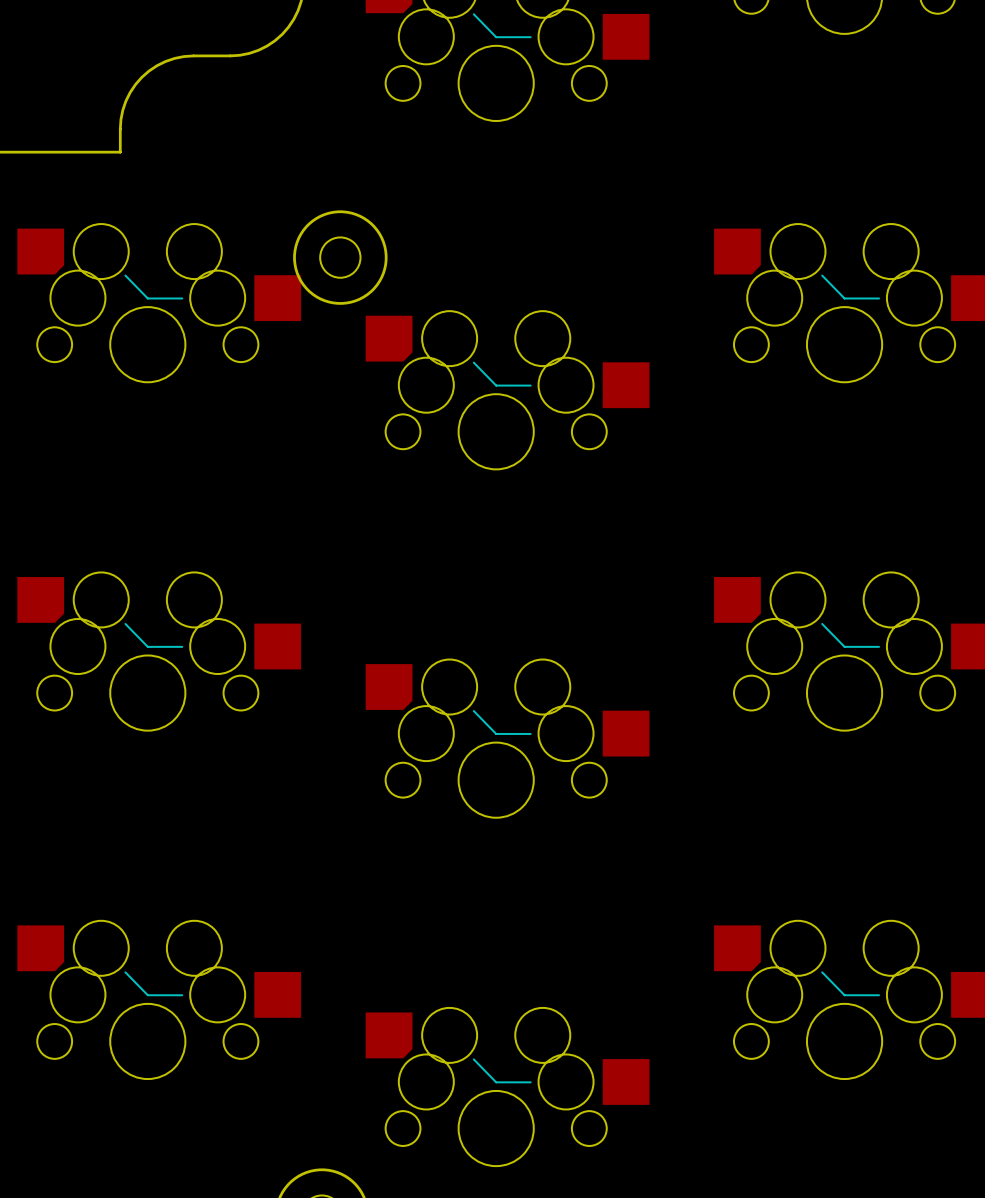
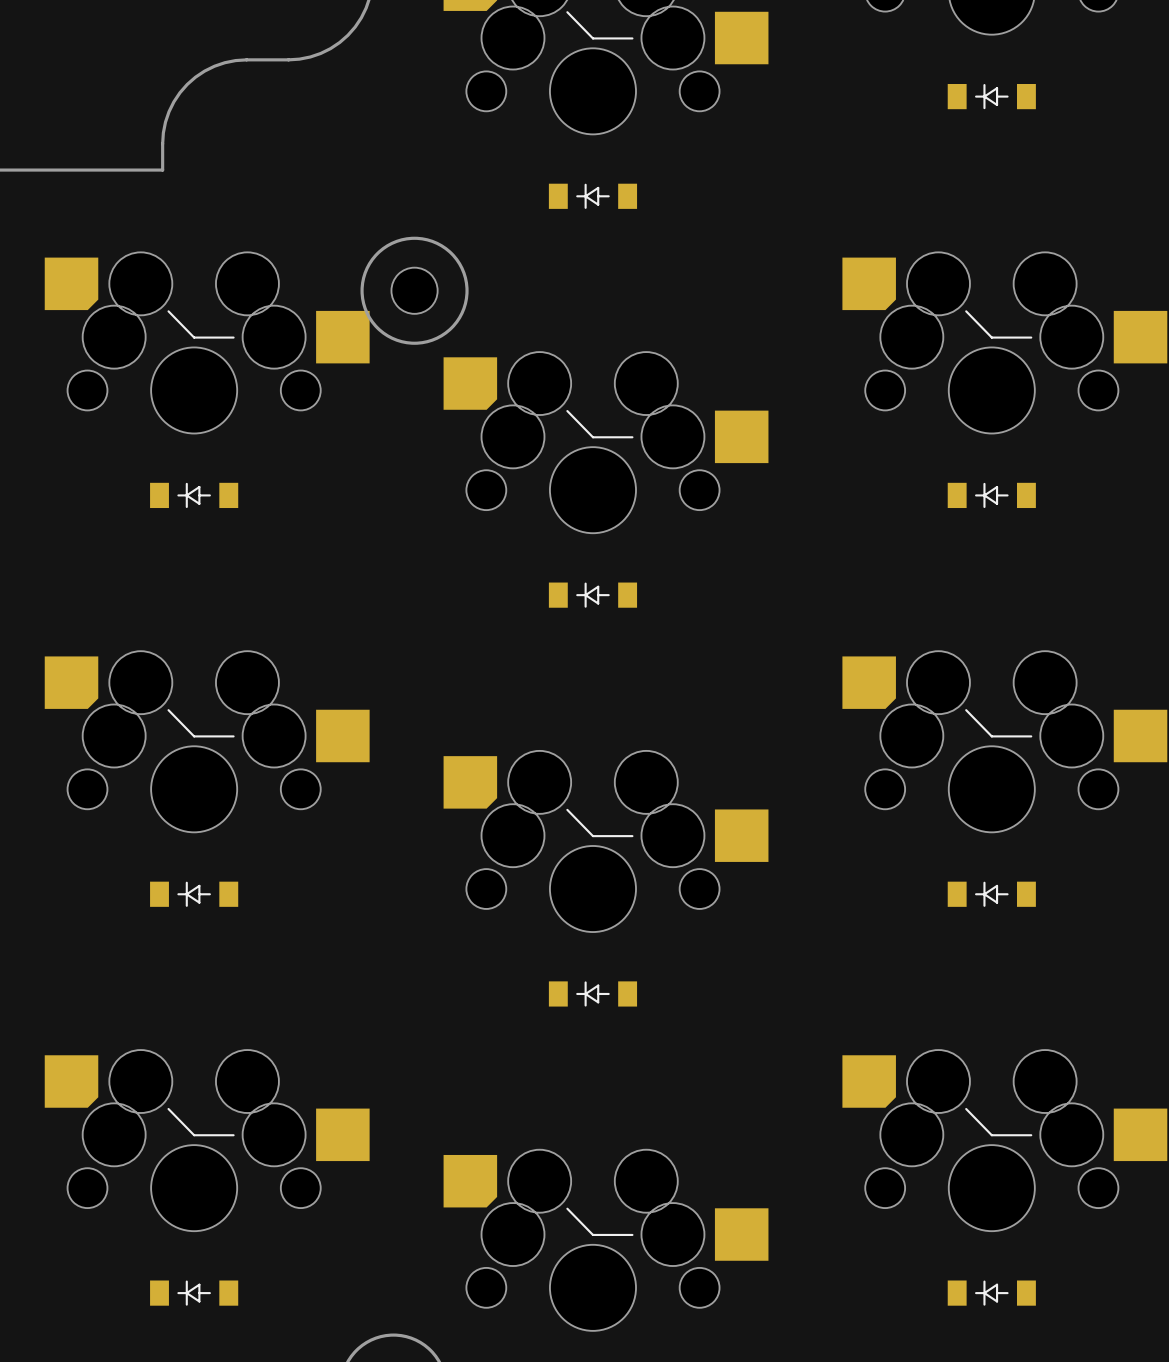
part: none -> (991, 96)
part: none -> (592, 196)
part: none -> (194, 495)
part: none -> (991, 495)
part: none -> (592, 595)
part: none -> (194, 894)
part: none -> (991, 894)
part: none -> (592, 993)
part: none -> (194, 1293)
part: none -> (991, 1293)

